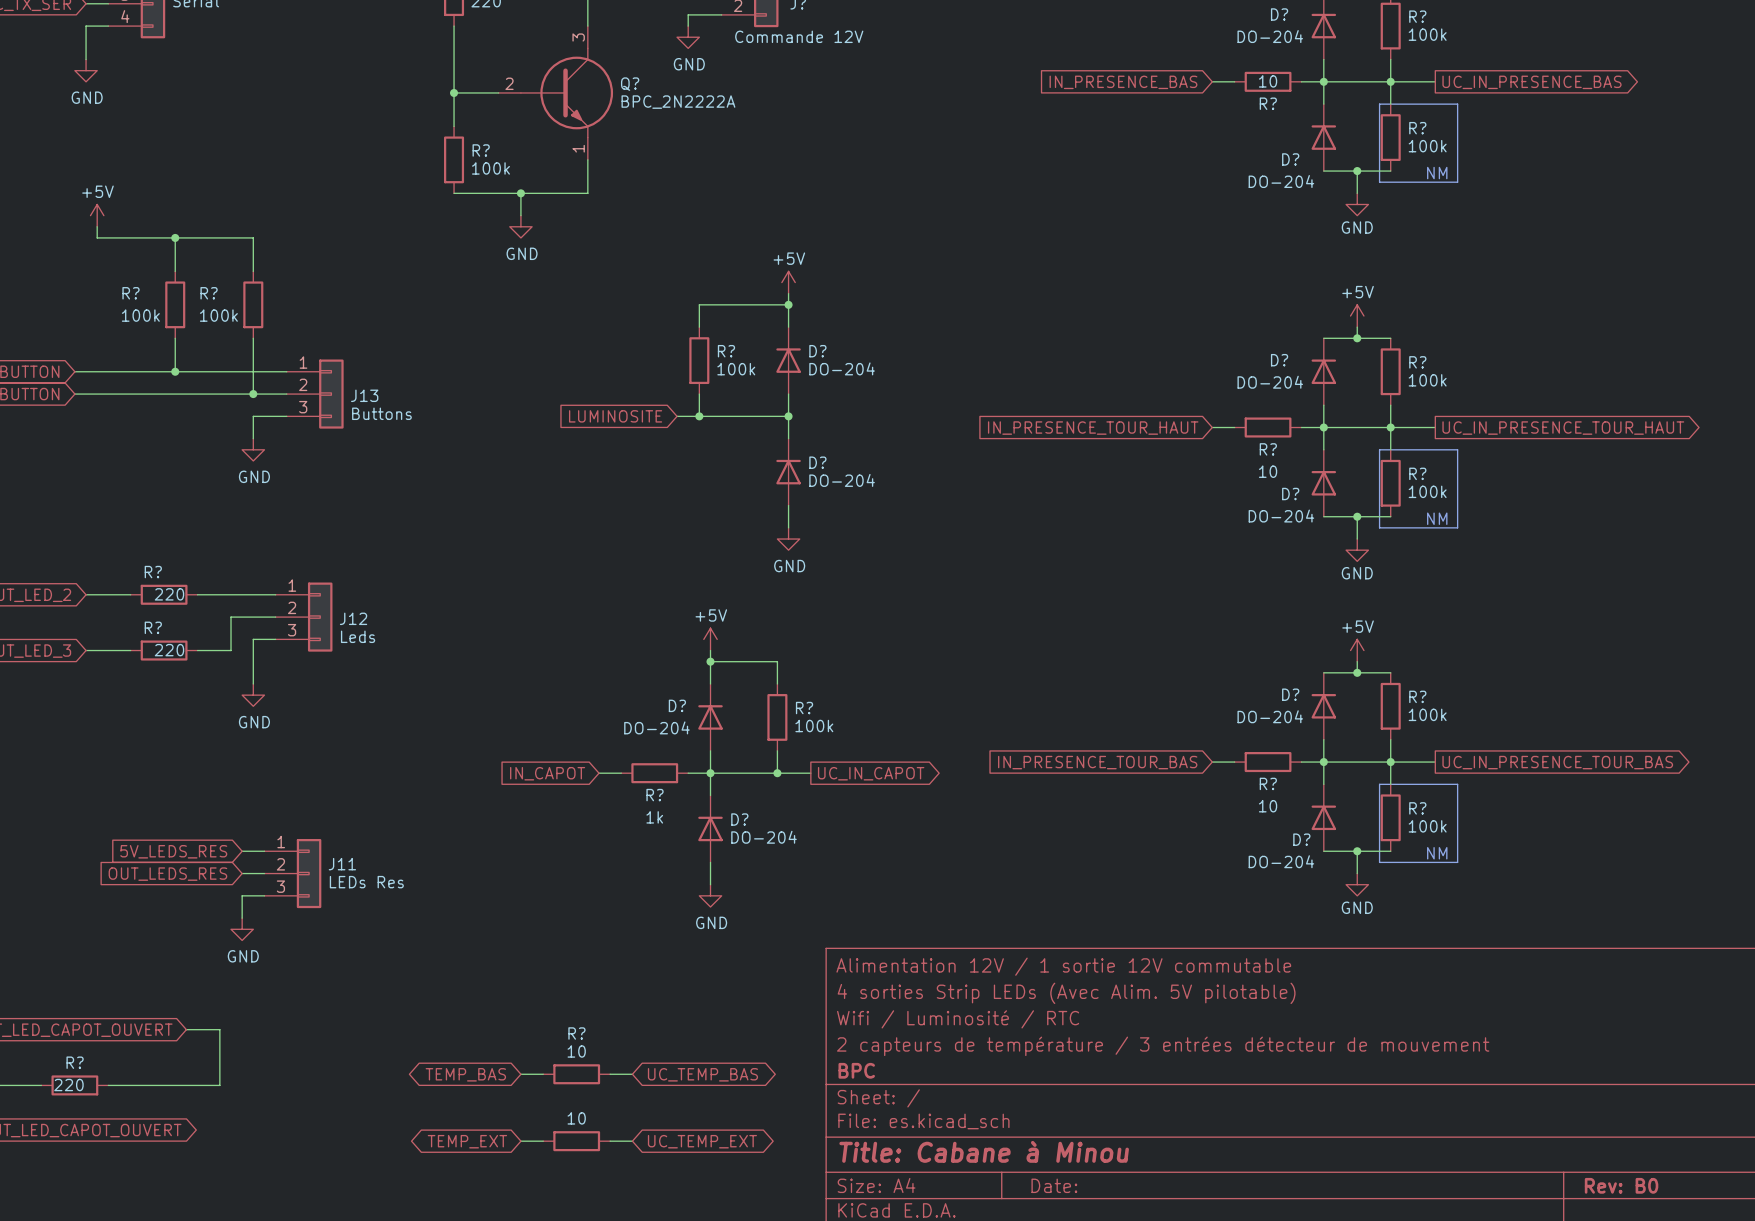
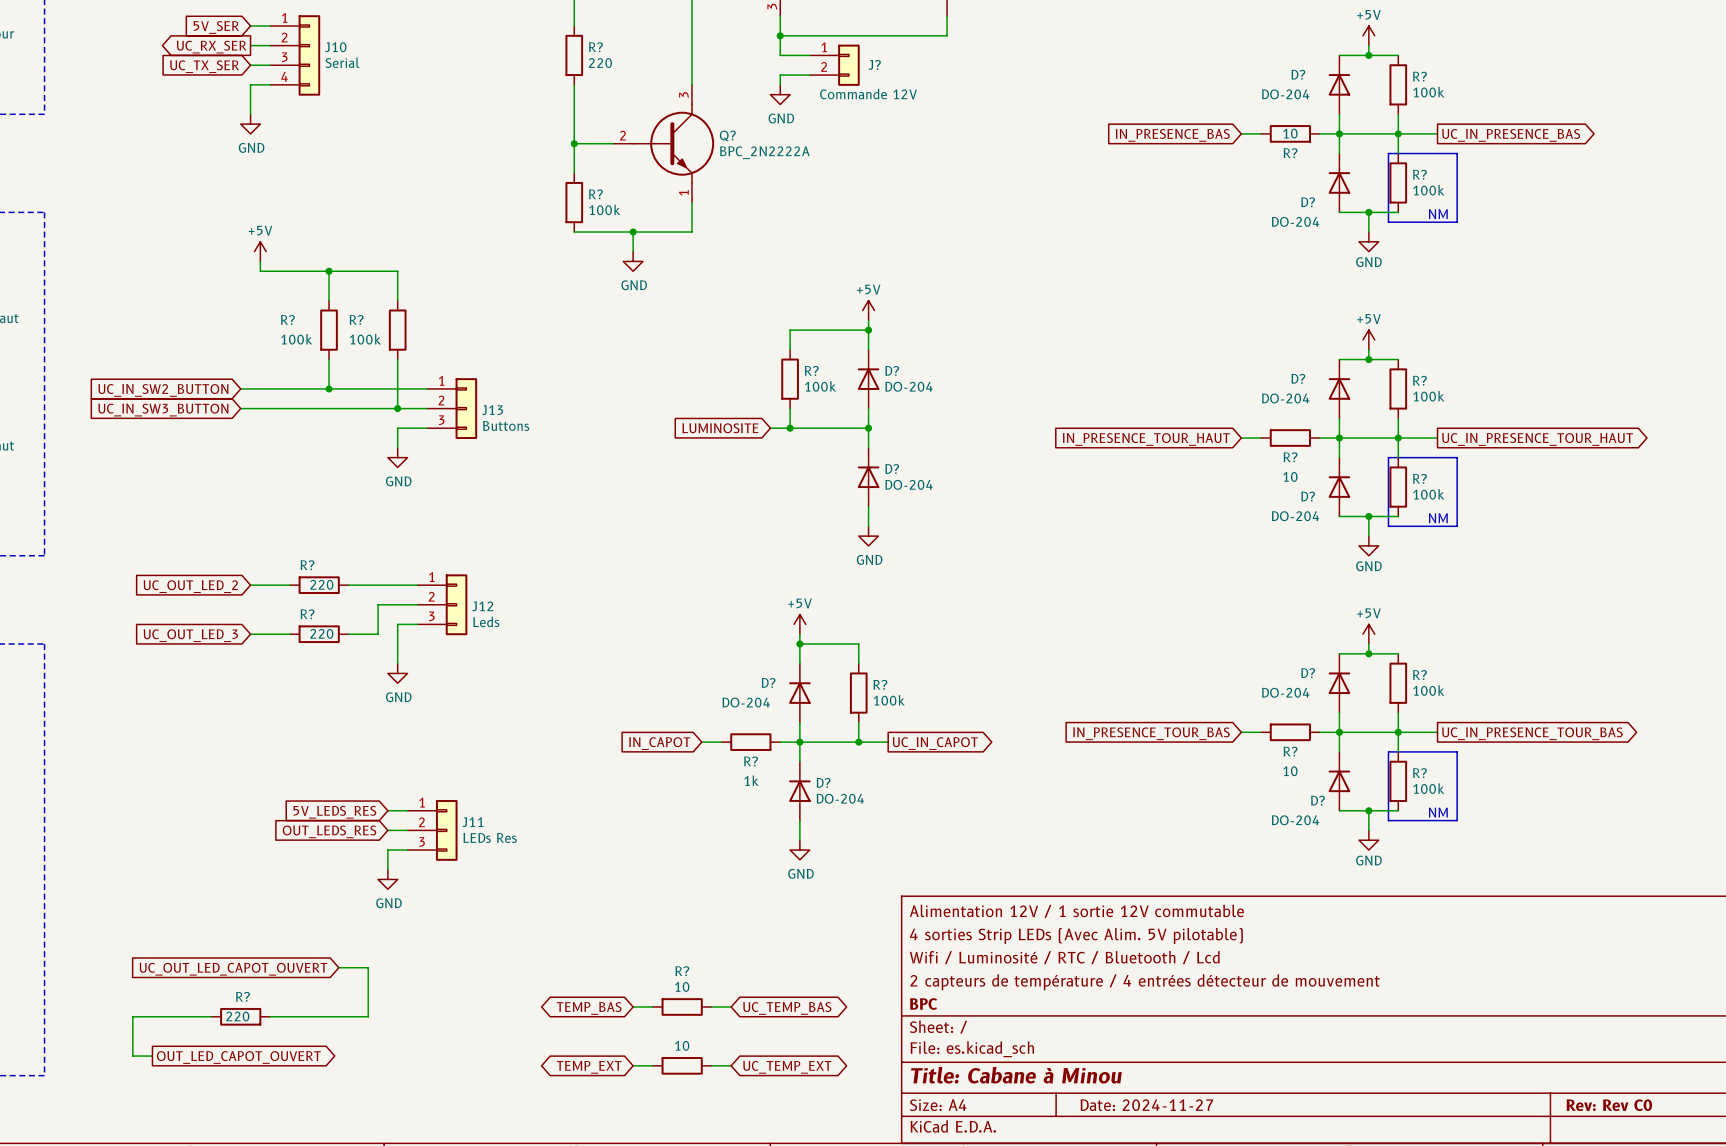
title block: Wifi / Luminosité / RTC (958, 1019) -> Wifi / Luminosité / RTC / Bluetooth / Lcd (1064, 957)
title block: 2 capteurs de température / 3 entrées détecteur de mouvement (1163, 1046) -> 2 capteurs de température / 4 entrées détecteur de mouvement (1145, 982)
title block: Date: (1054, 1185) -> Date: 2024-11-27 (1146, 1105)
title block: Rev: B0 (1621, 1185) -> Rev: Rev C0 (1609, 1105)

